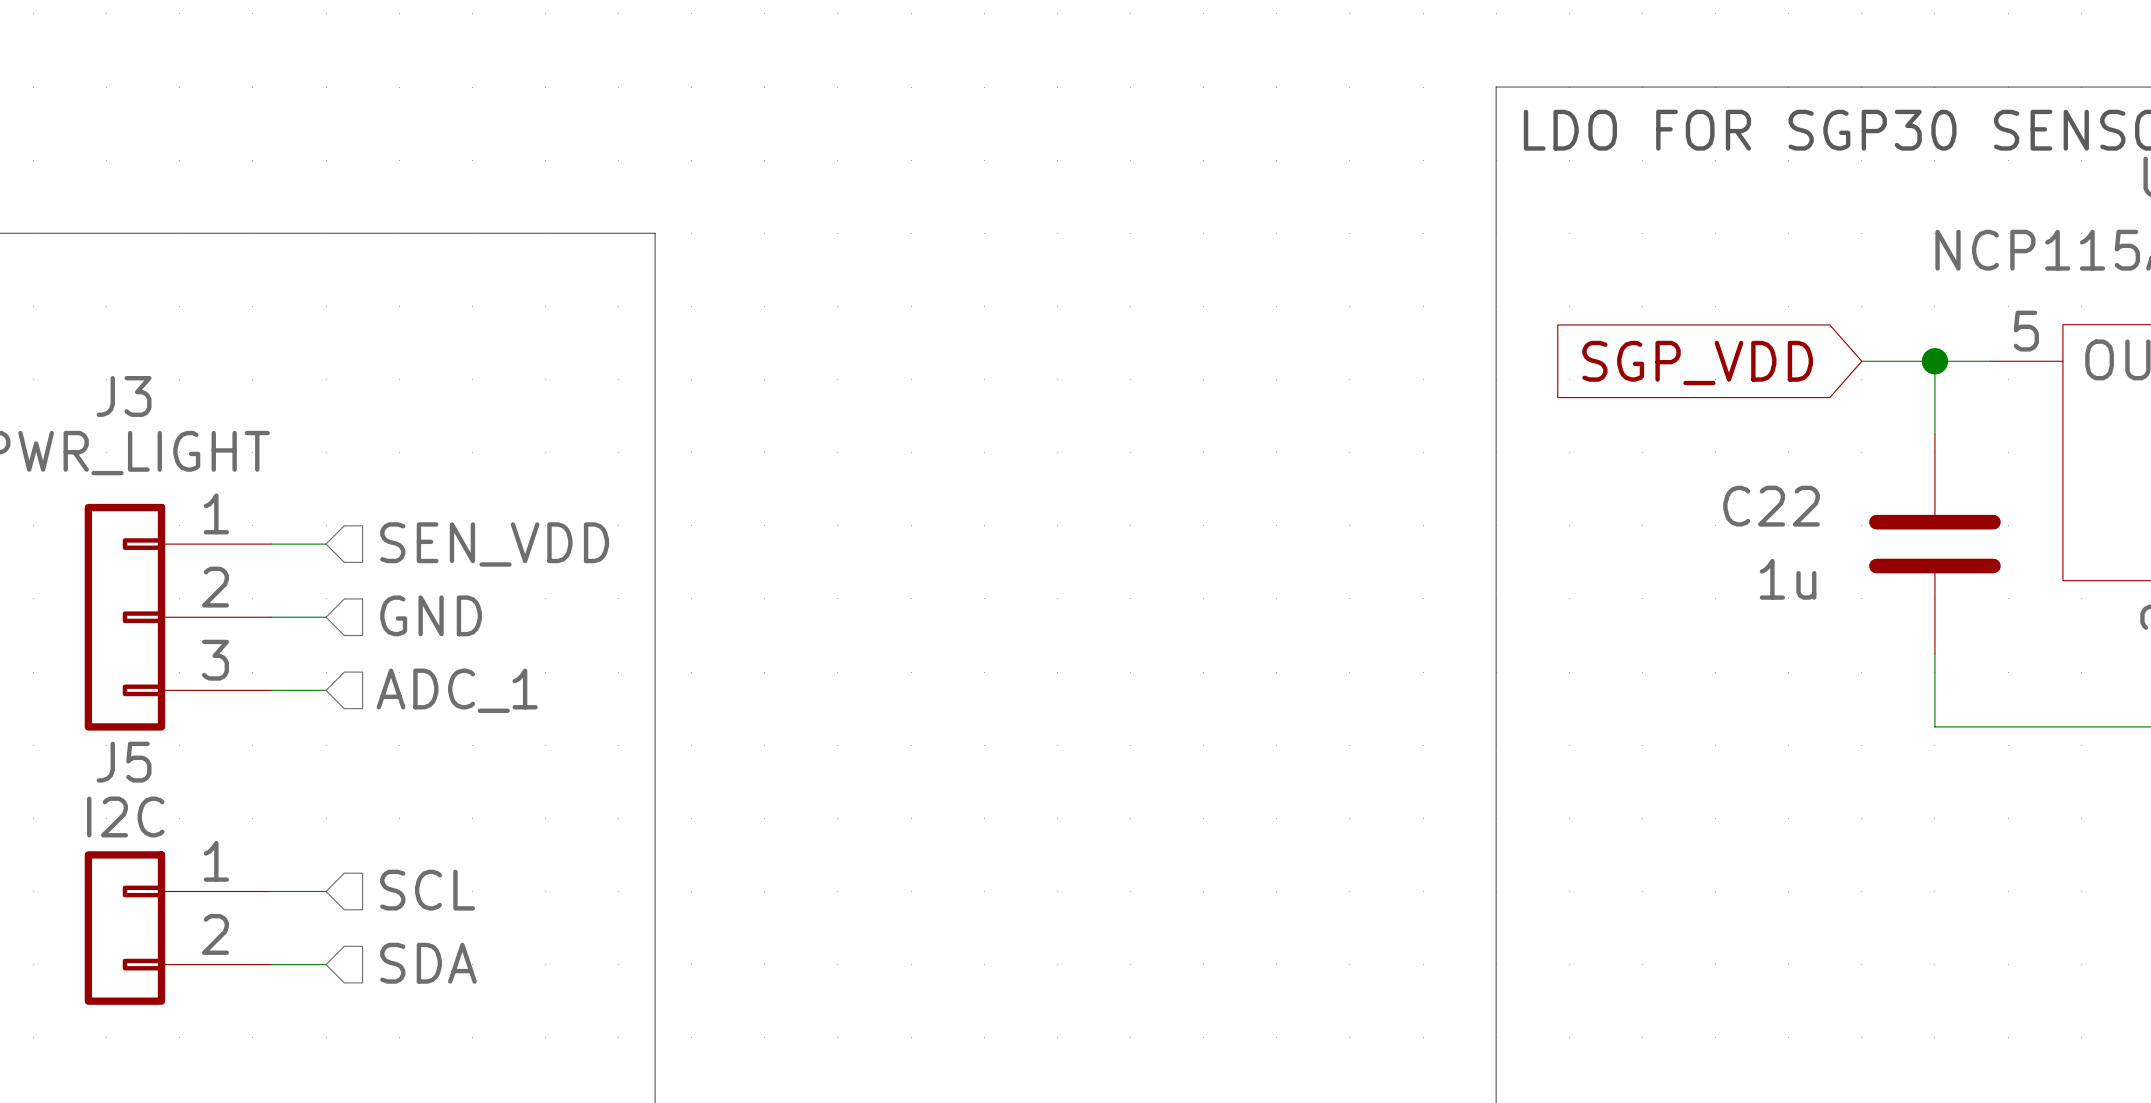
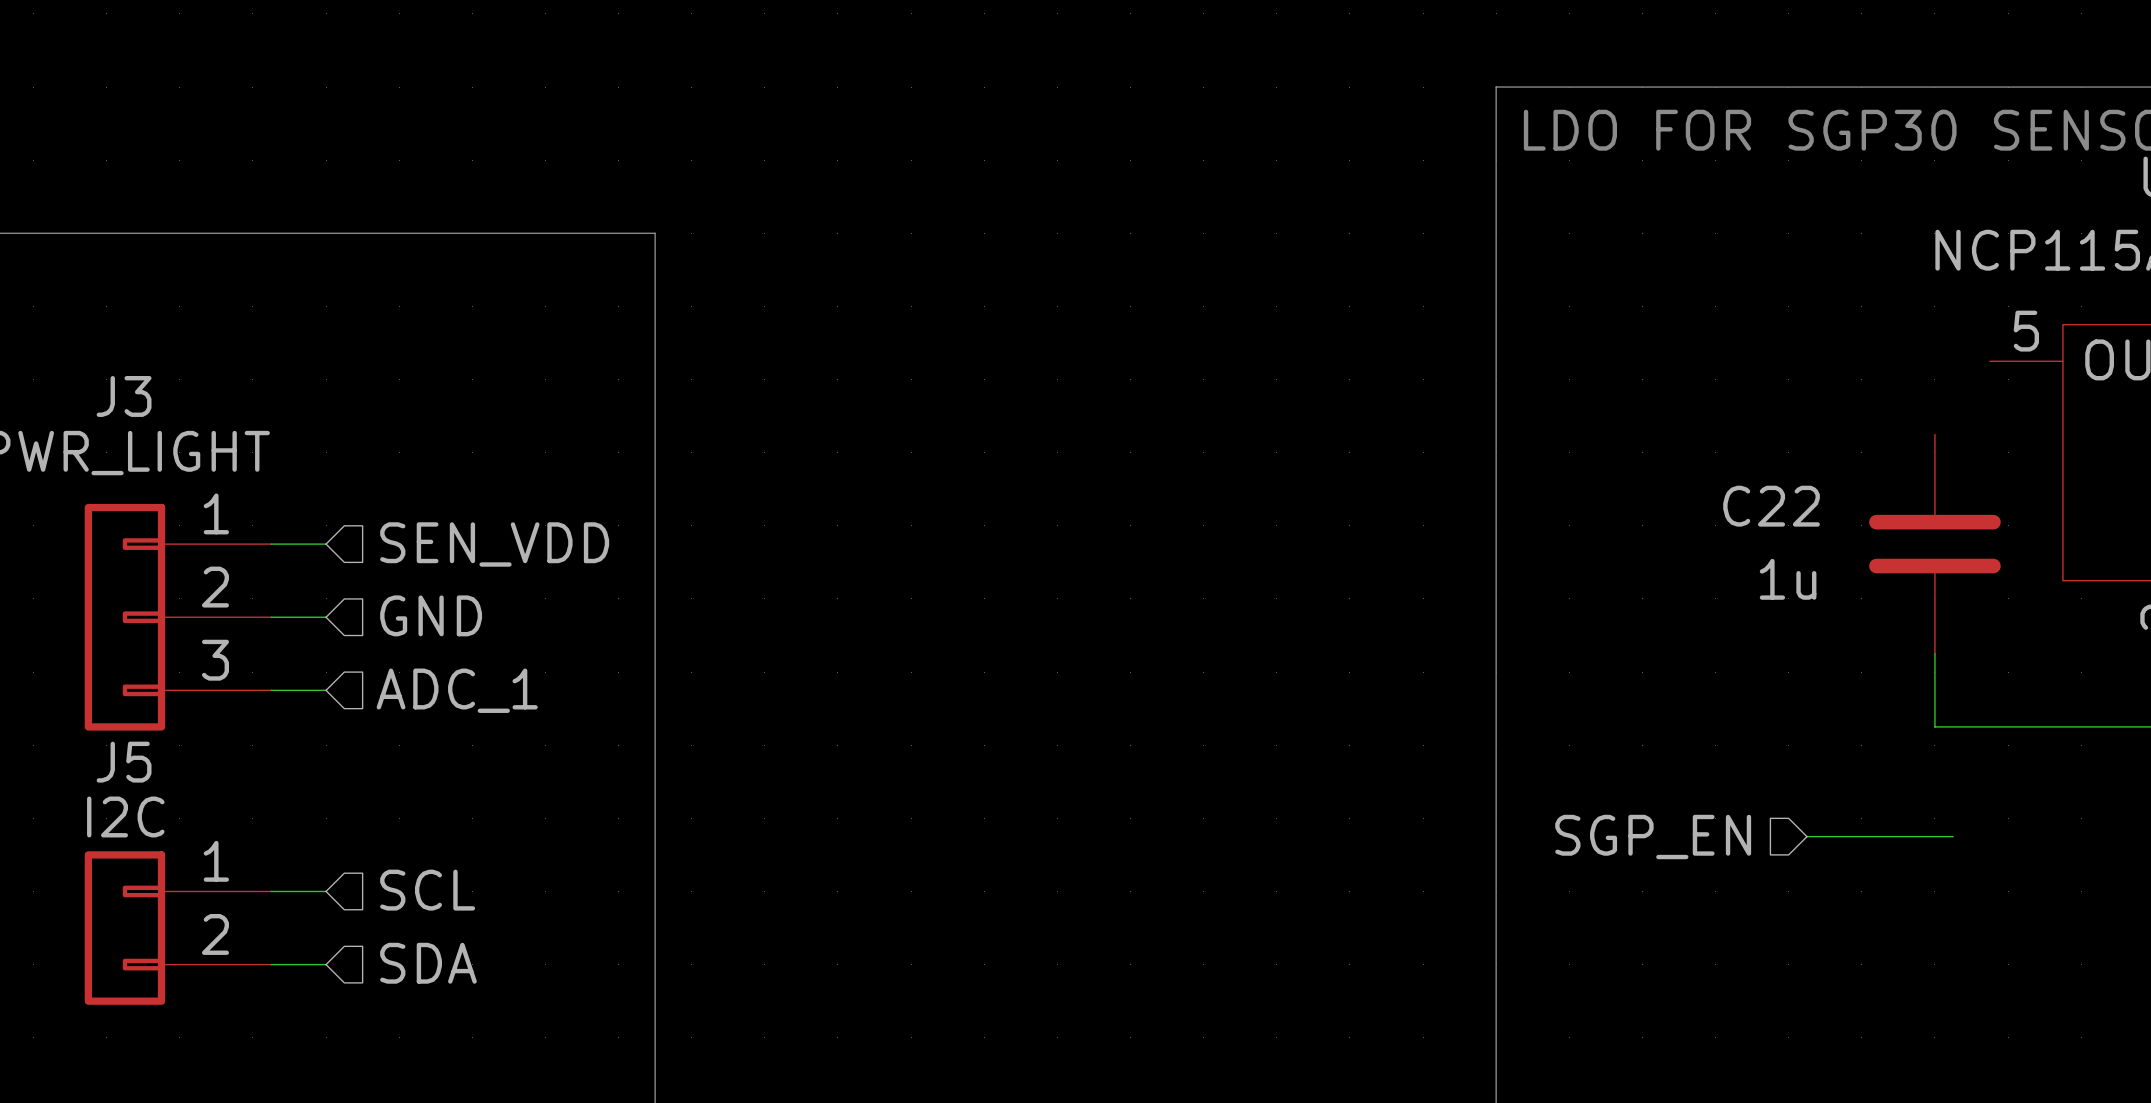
wire: (1861, 361) (1989, 361) -> none
wire: (1934, 361) (1934, 434) -> none
junction: (1934, 361) -> none
global label: SGP_VDD (1697, 363) -> none
wire: none -> (1806, 836) (1953, 836)
hierarchical label: none -> SGP_EN (1653, 837)

